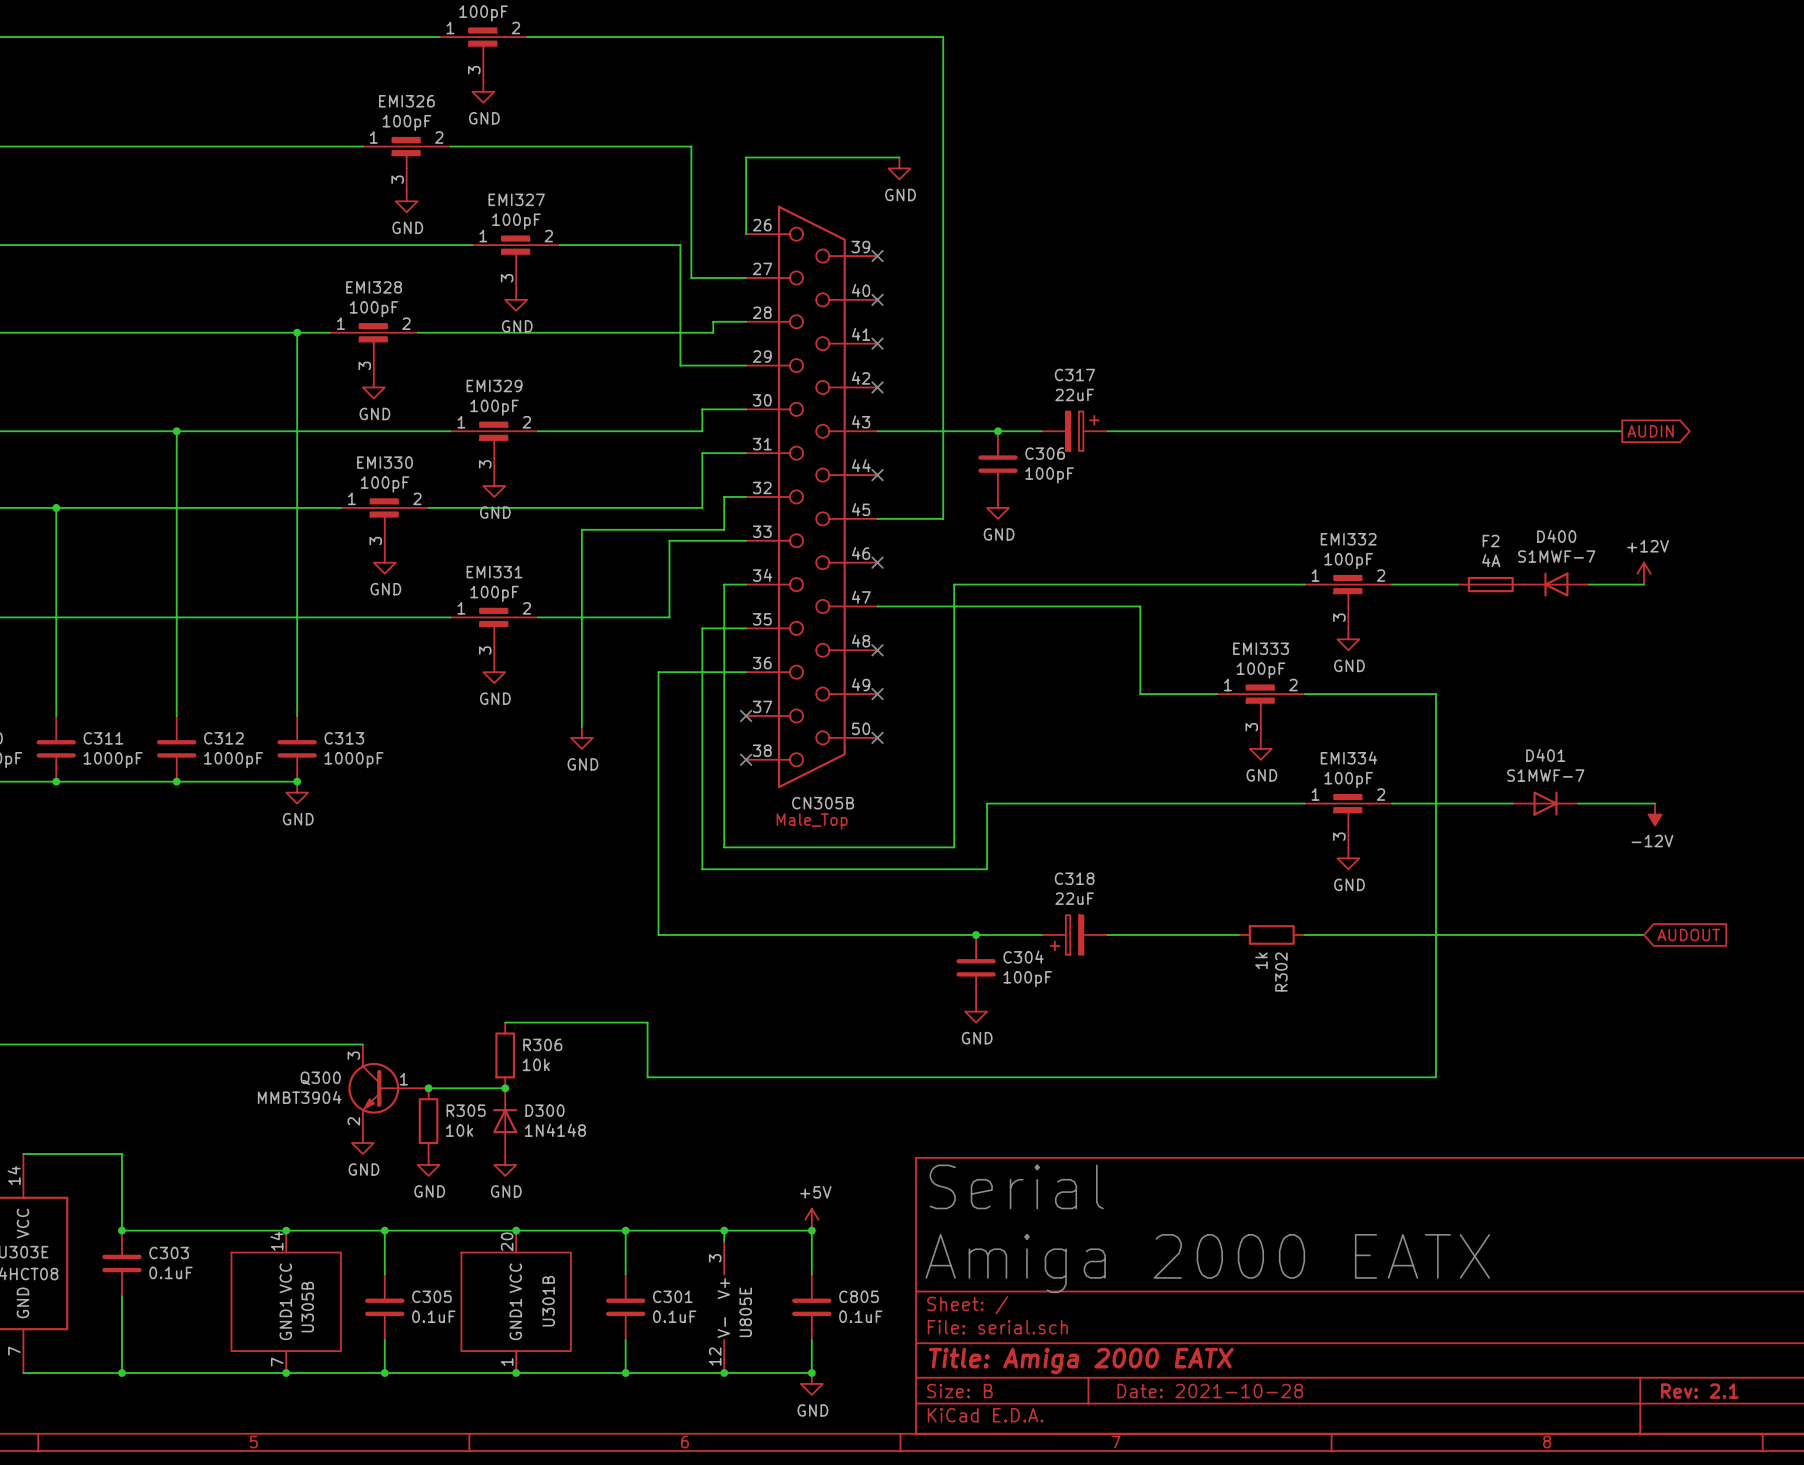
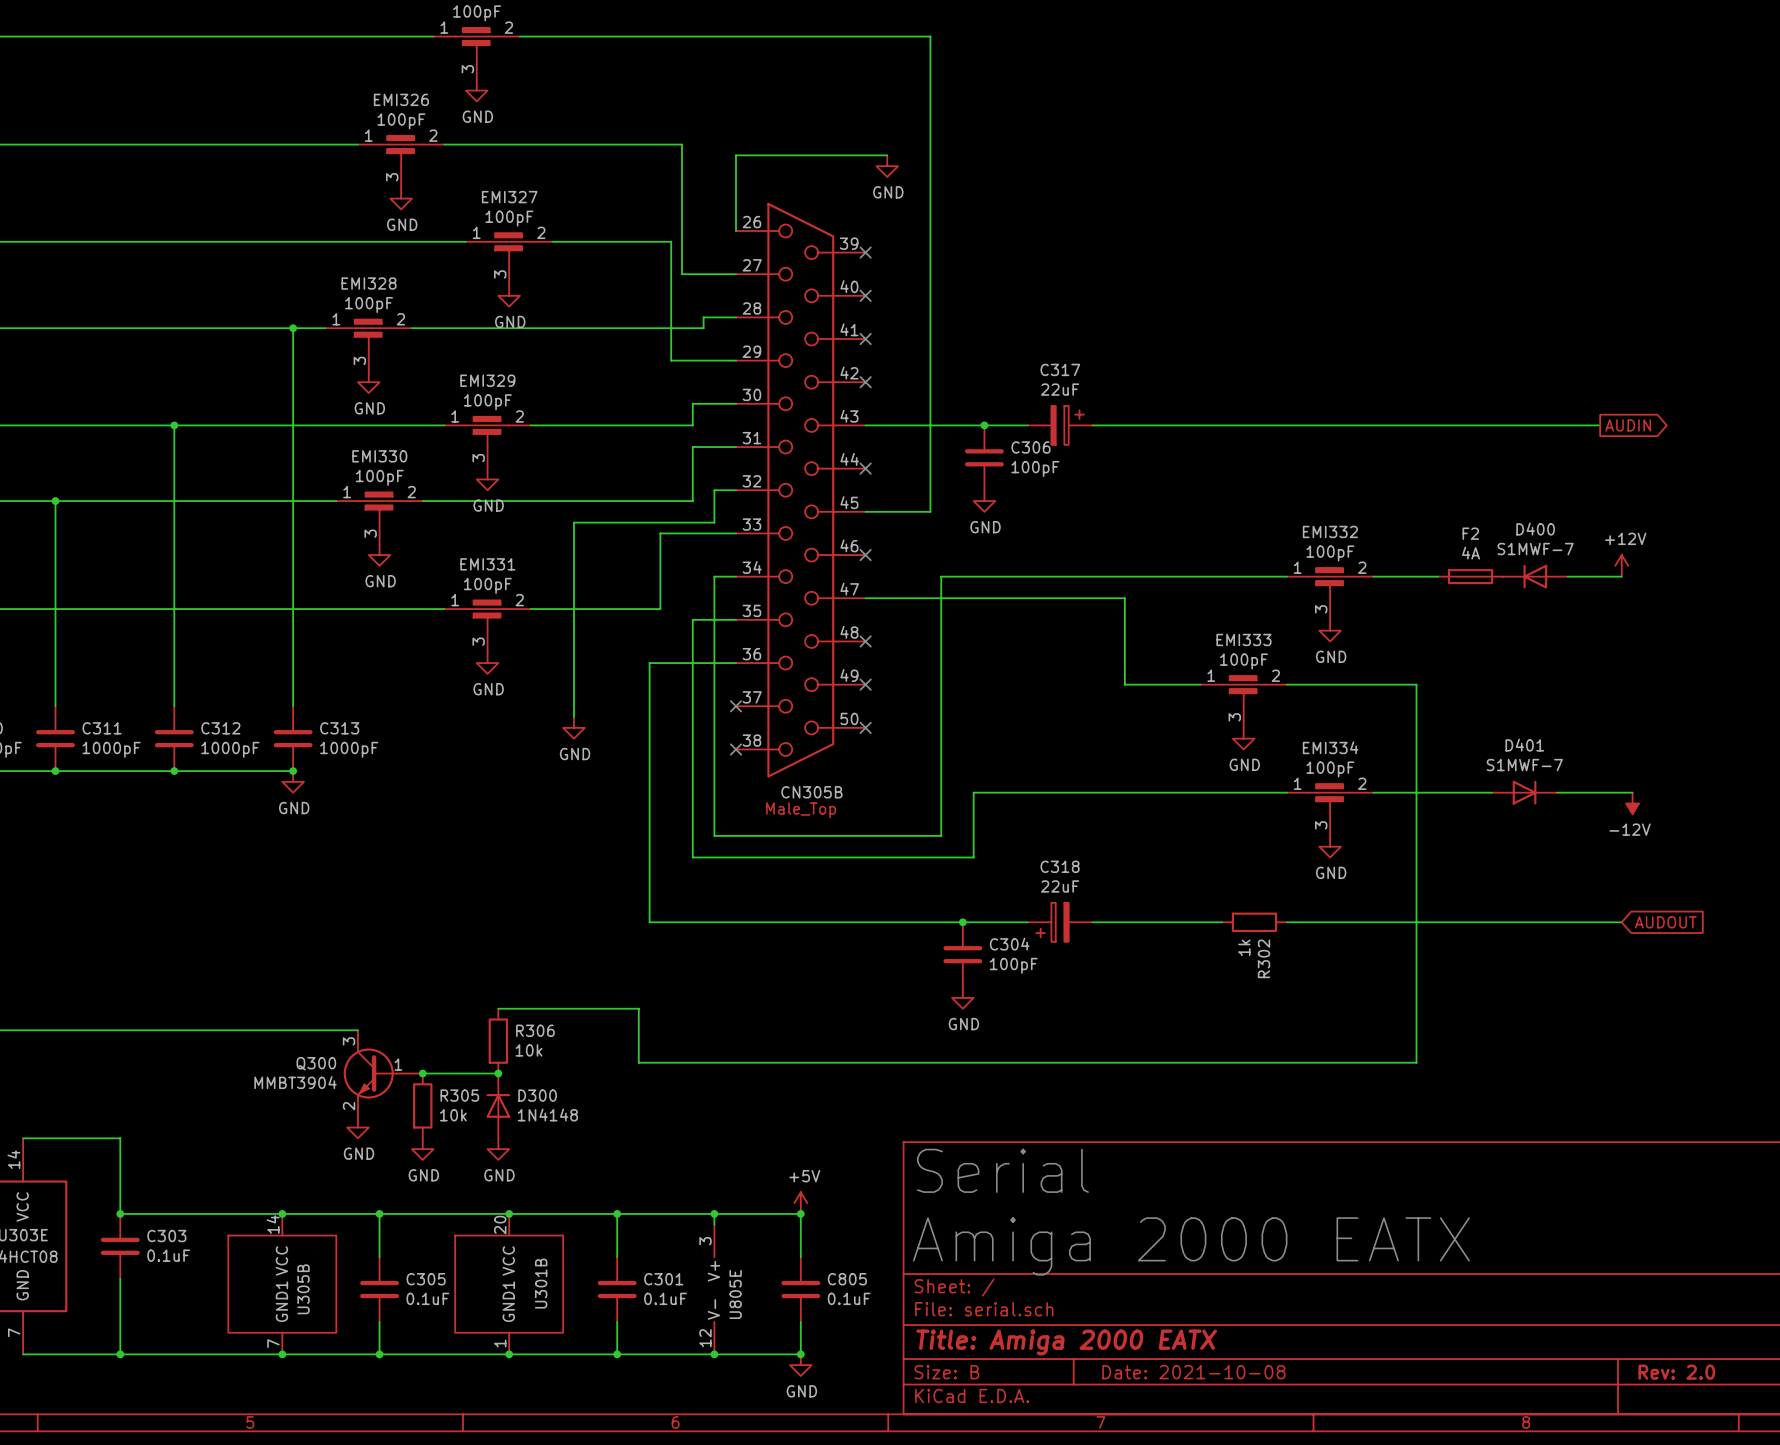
title block: Date: 2021-10-28 (1210, 1391) -> Date: 2021-10-08 (1193, 1372)
title block: Rev: 2.1 (1699, 1391) -> Rev: 2.0 (1676, 1372)

